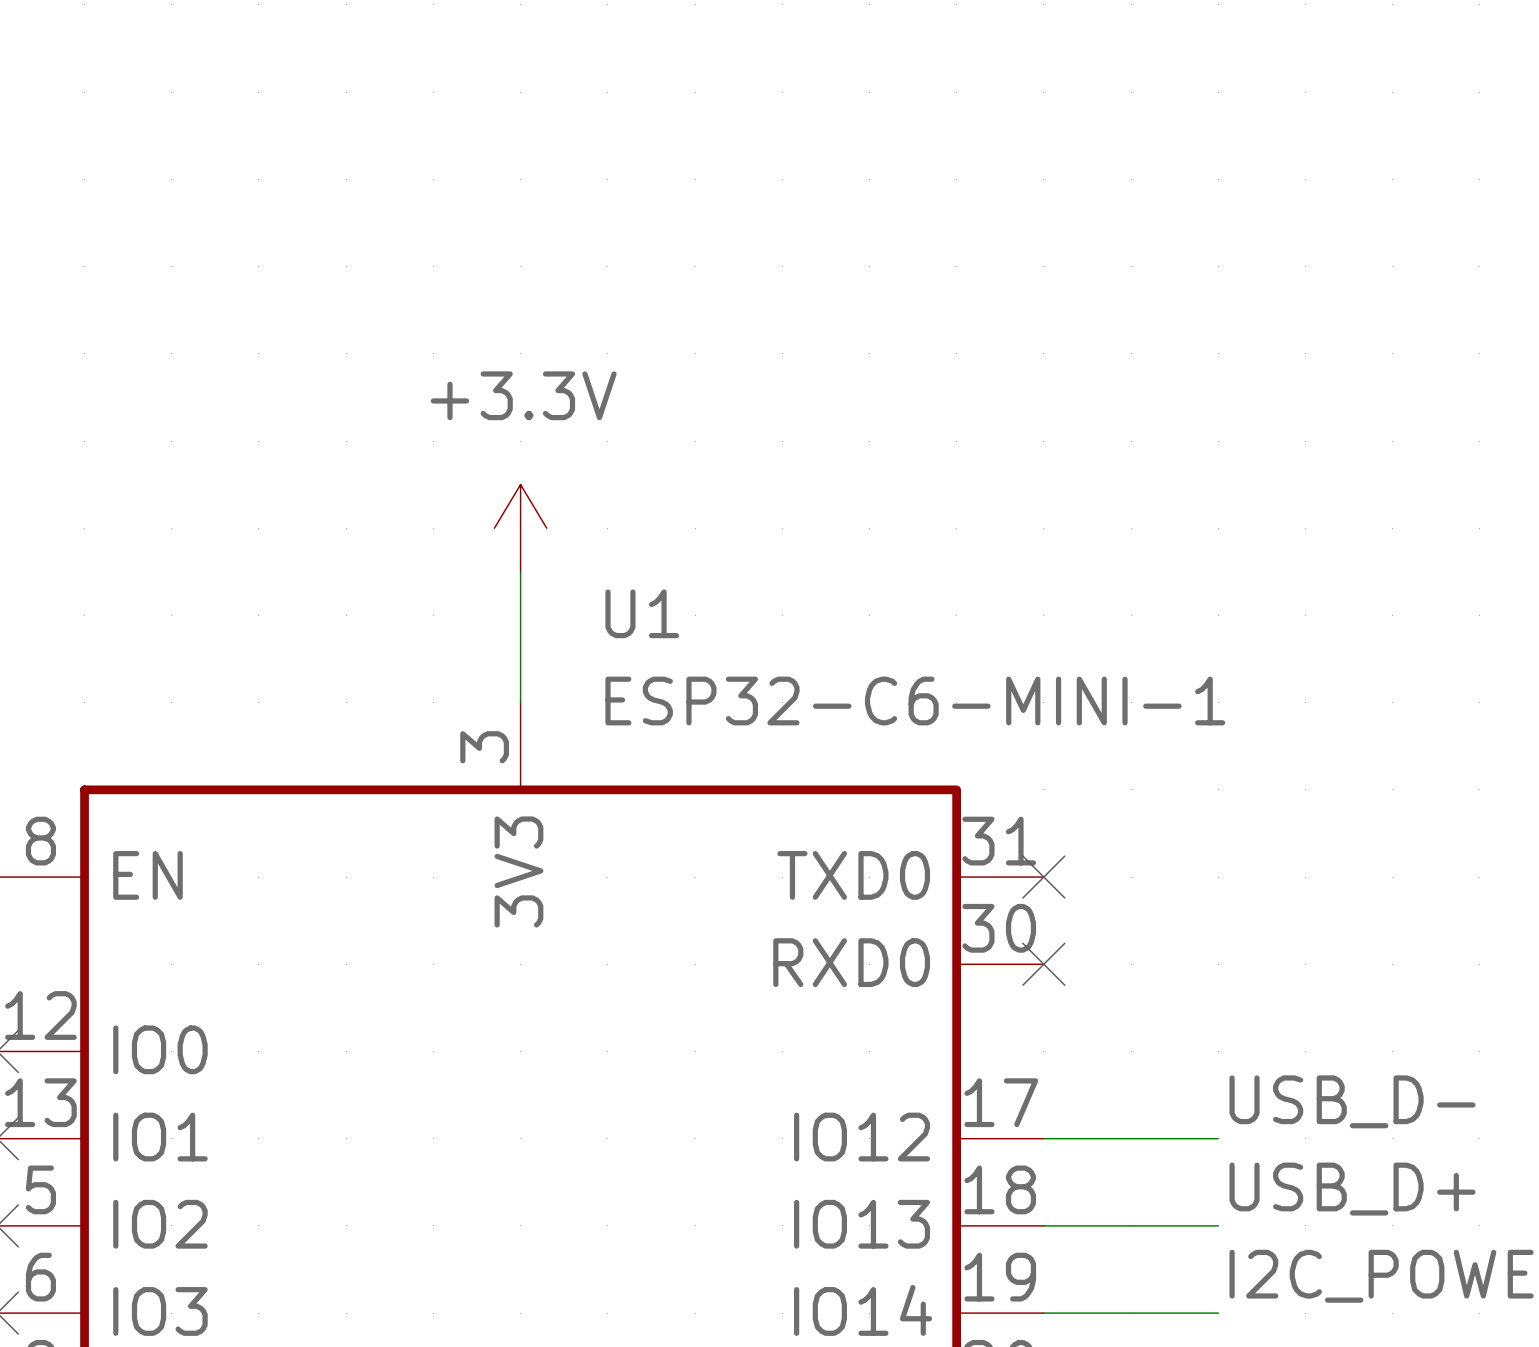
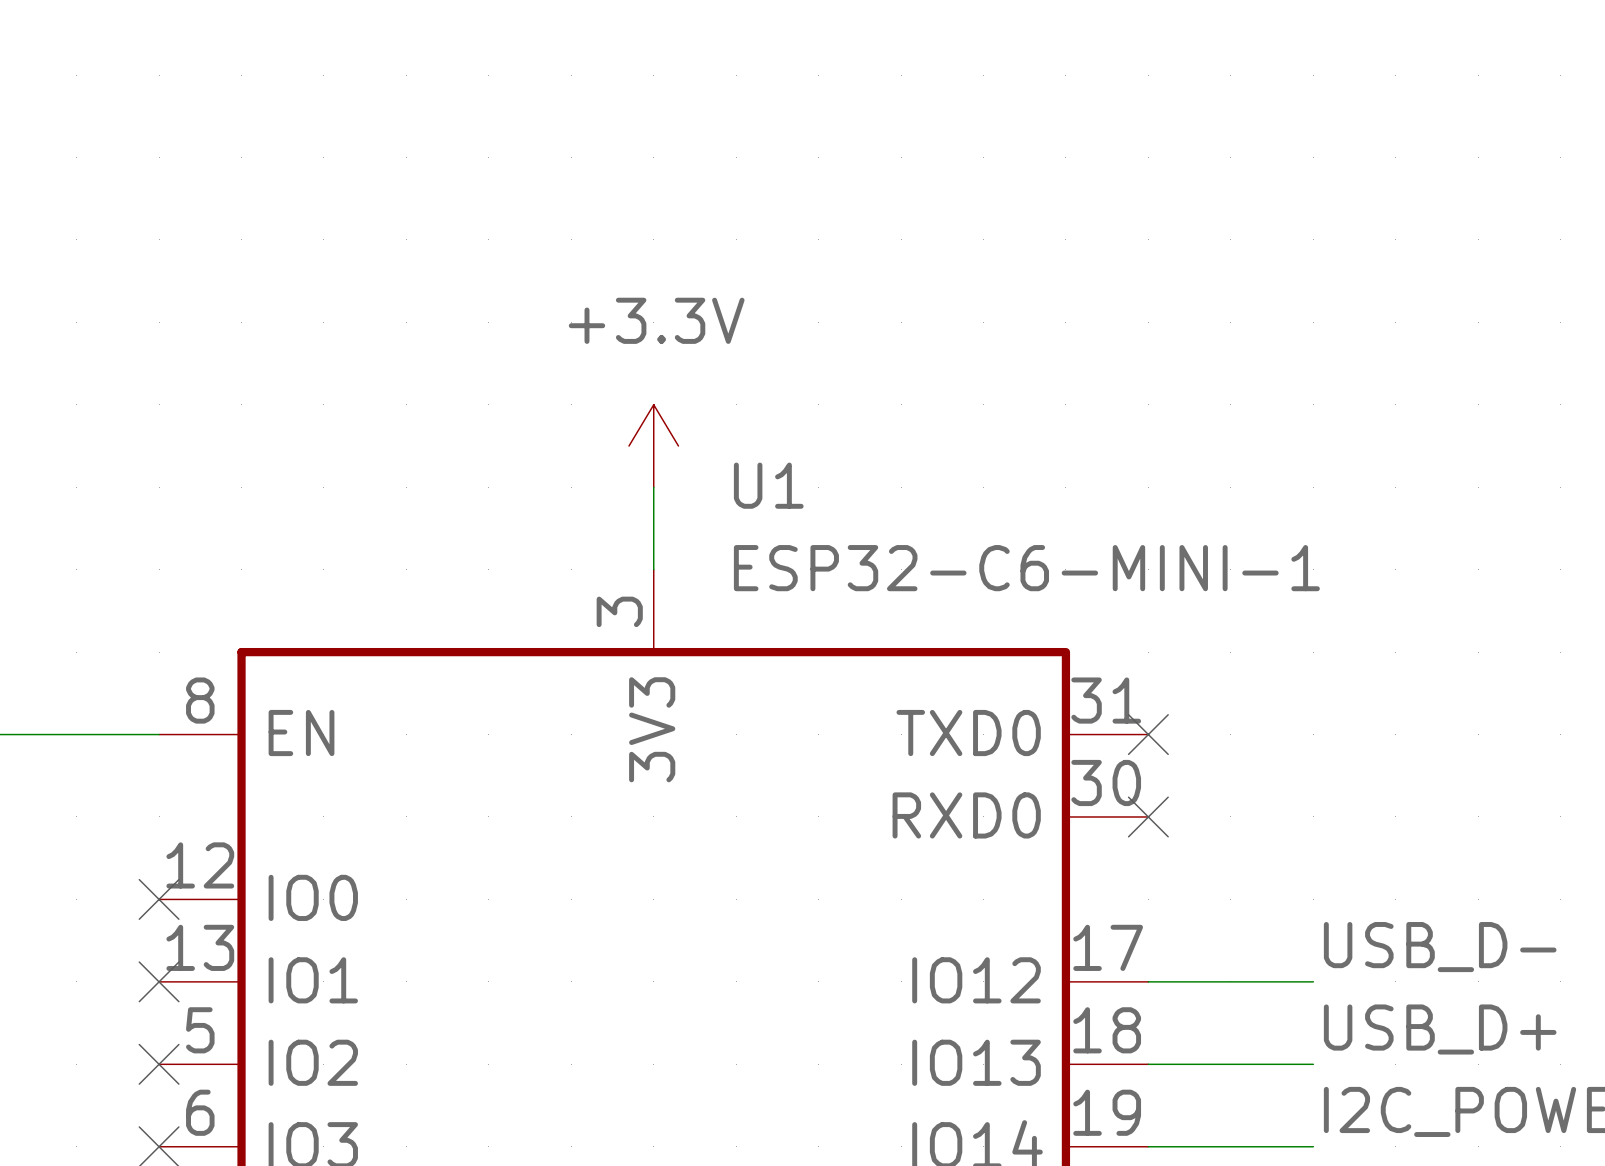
power symbol position: +3.3V (520, 528) -> +3.3V (653, 446)

